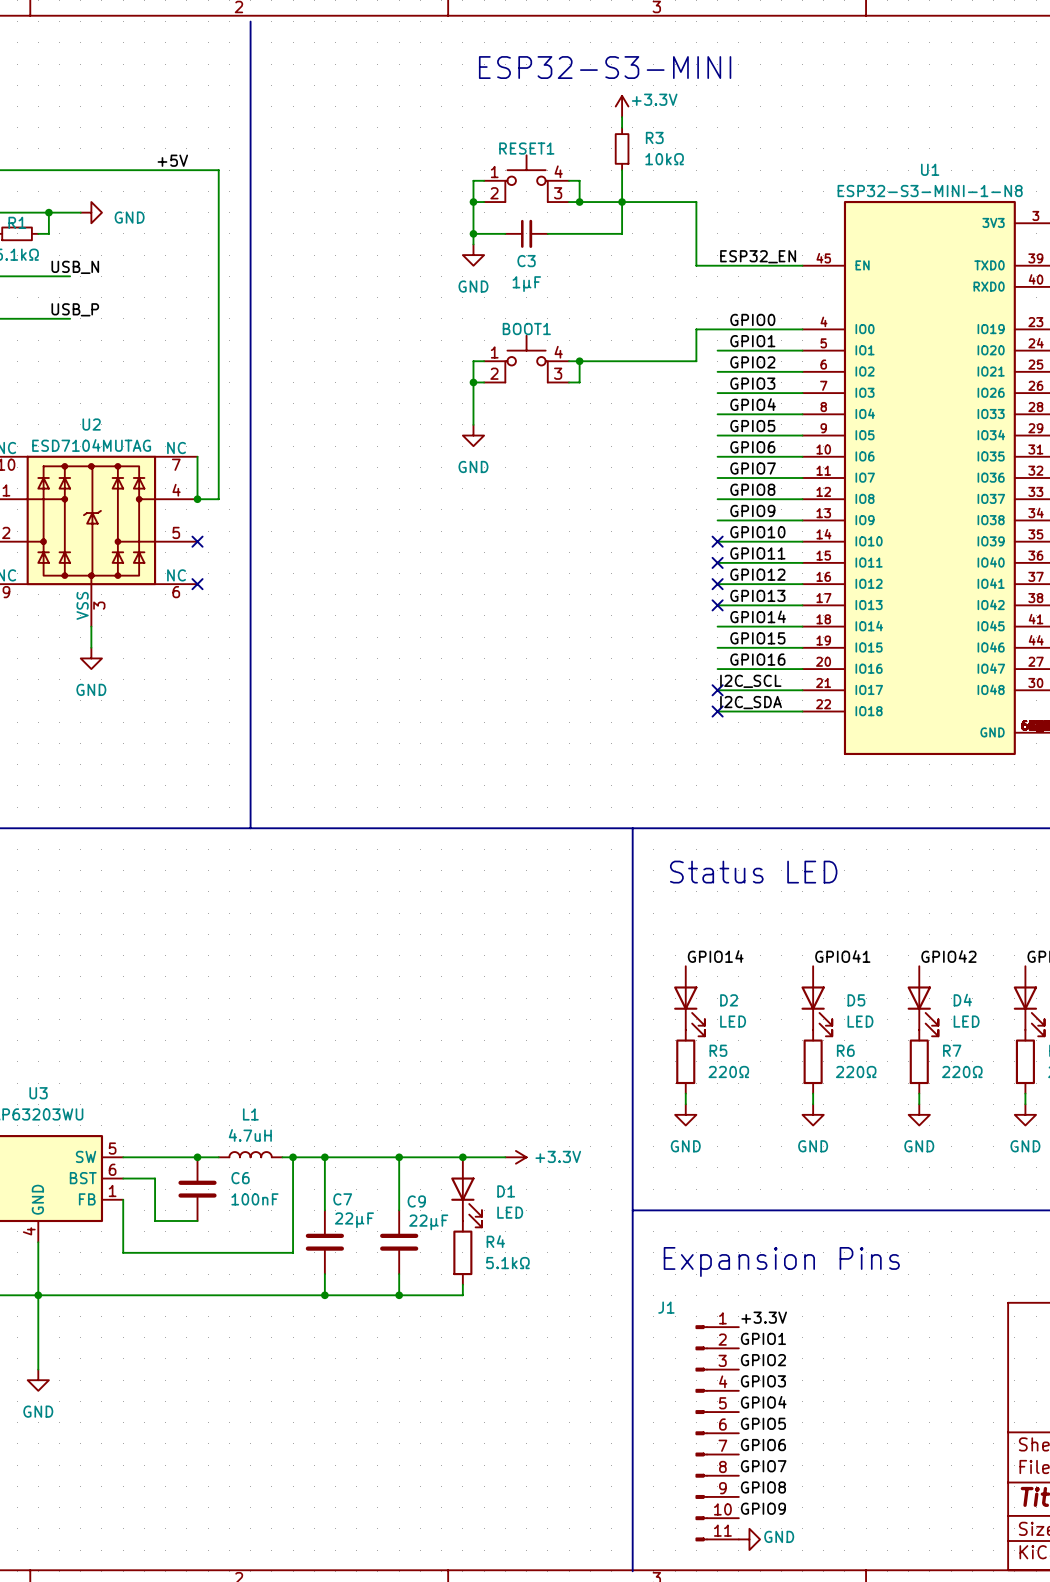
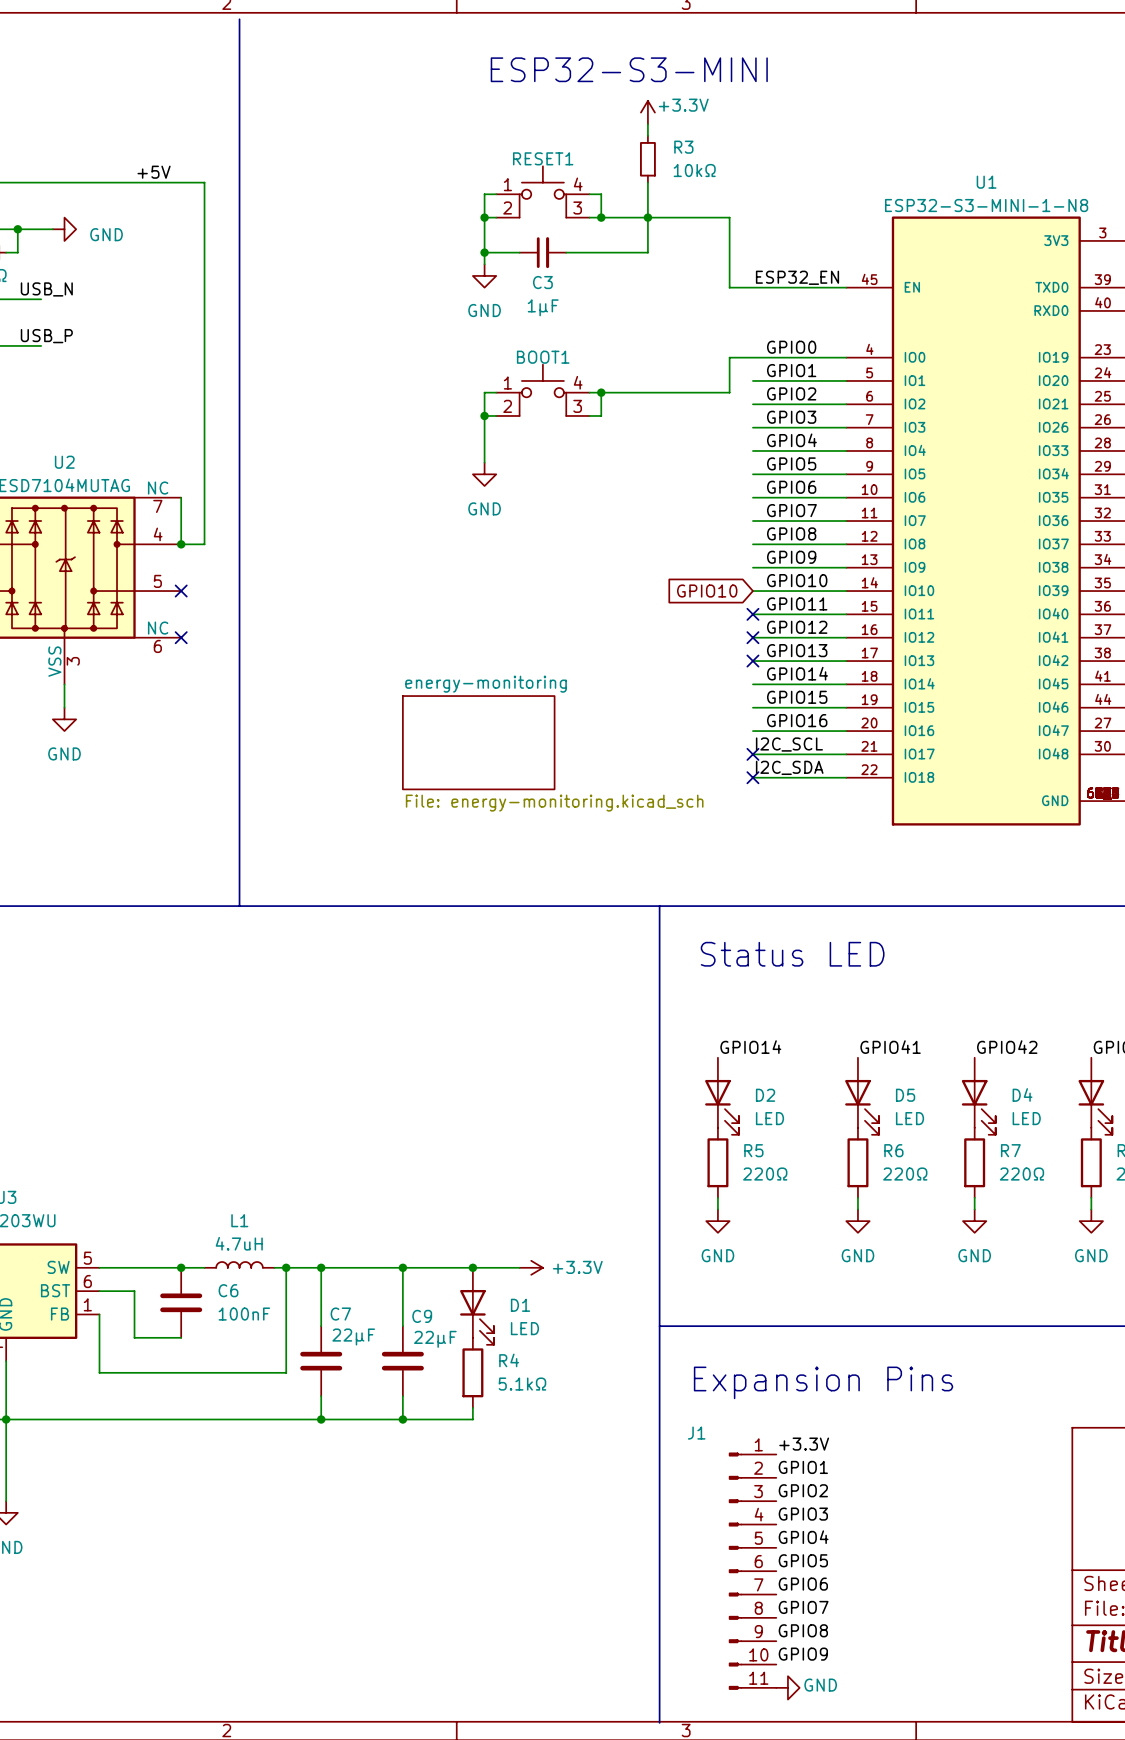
global label: none -> GPIO10 (707, 591)
no-connect mark: (717, 541) -> none
sheet energy-monitoring: none -> File: energy-monitoring.kicad_sch (478, 742)

